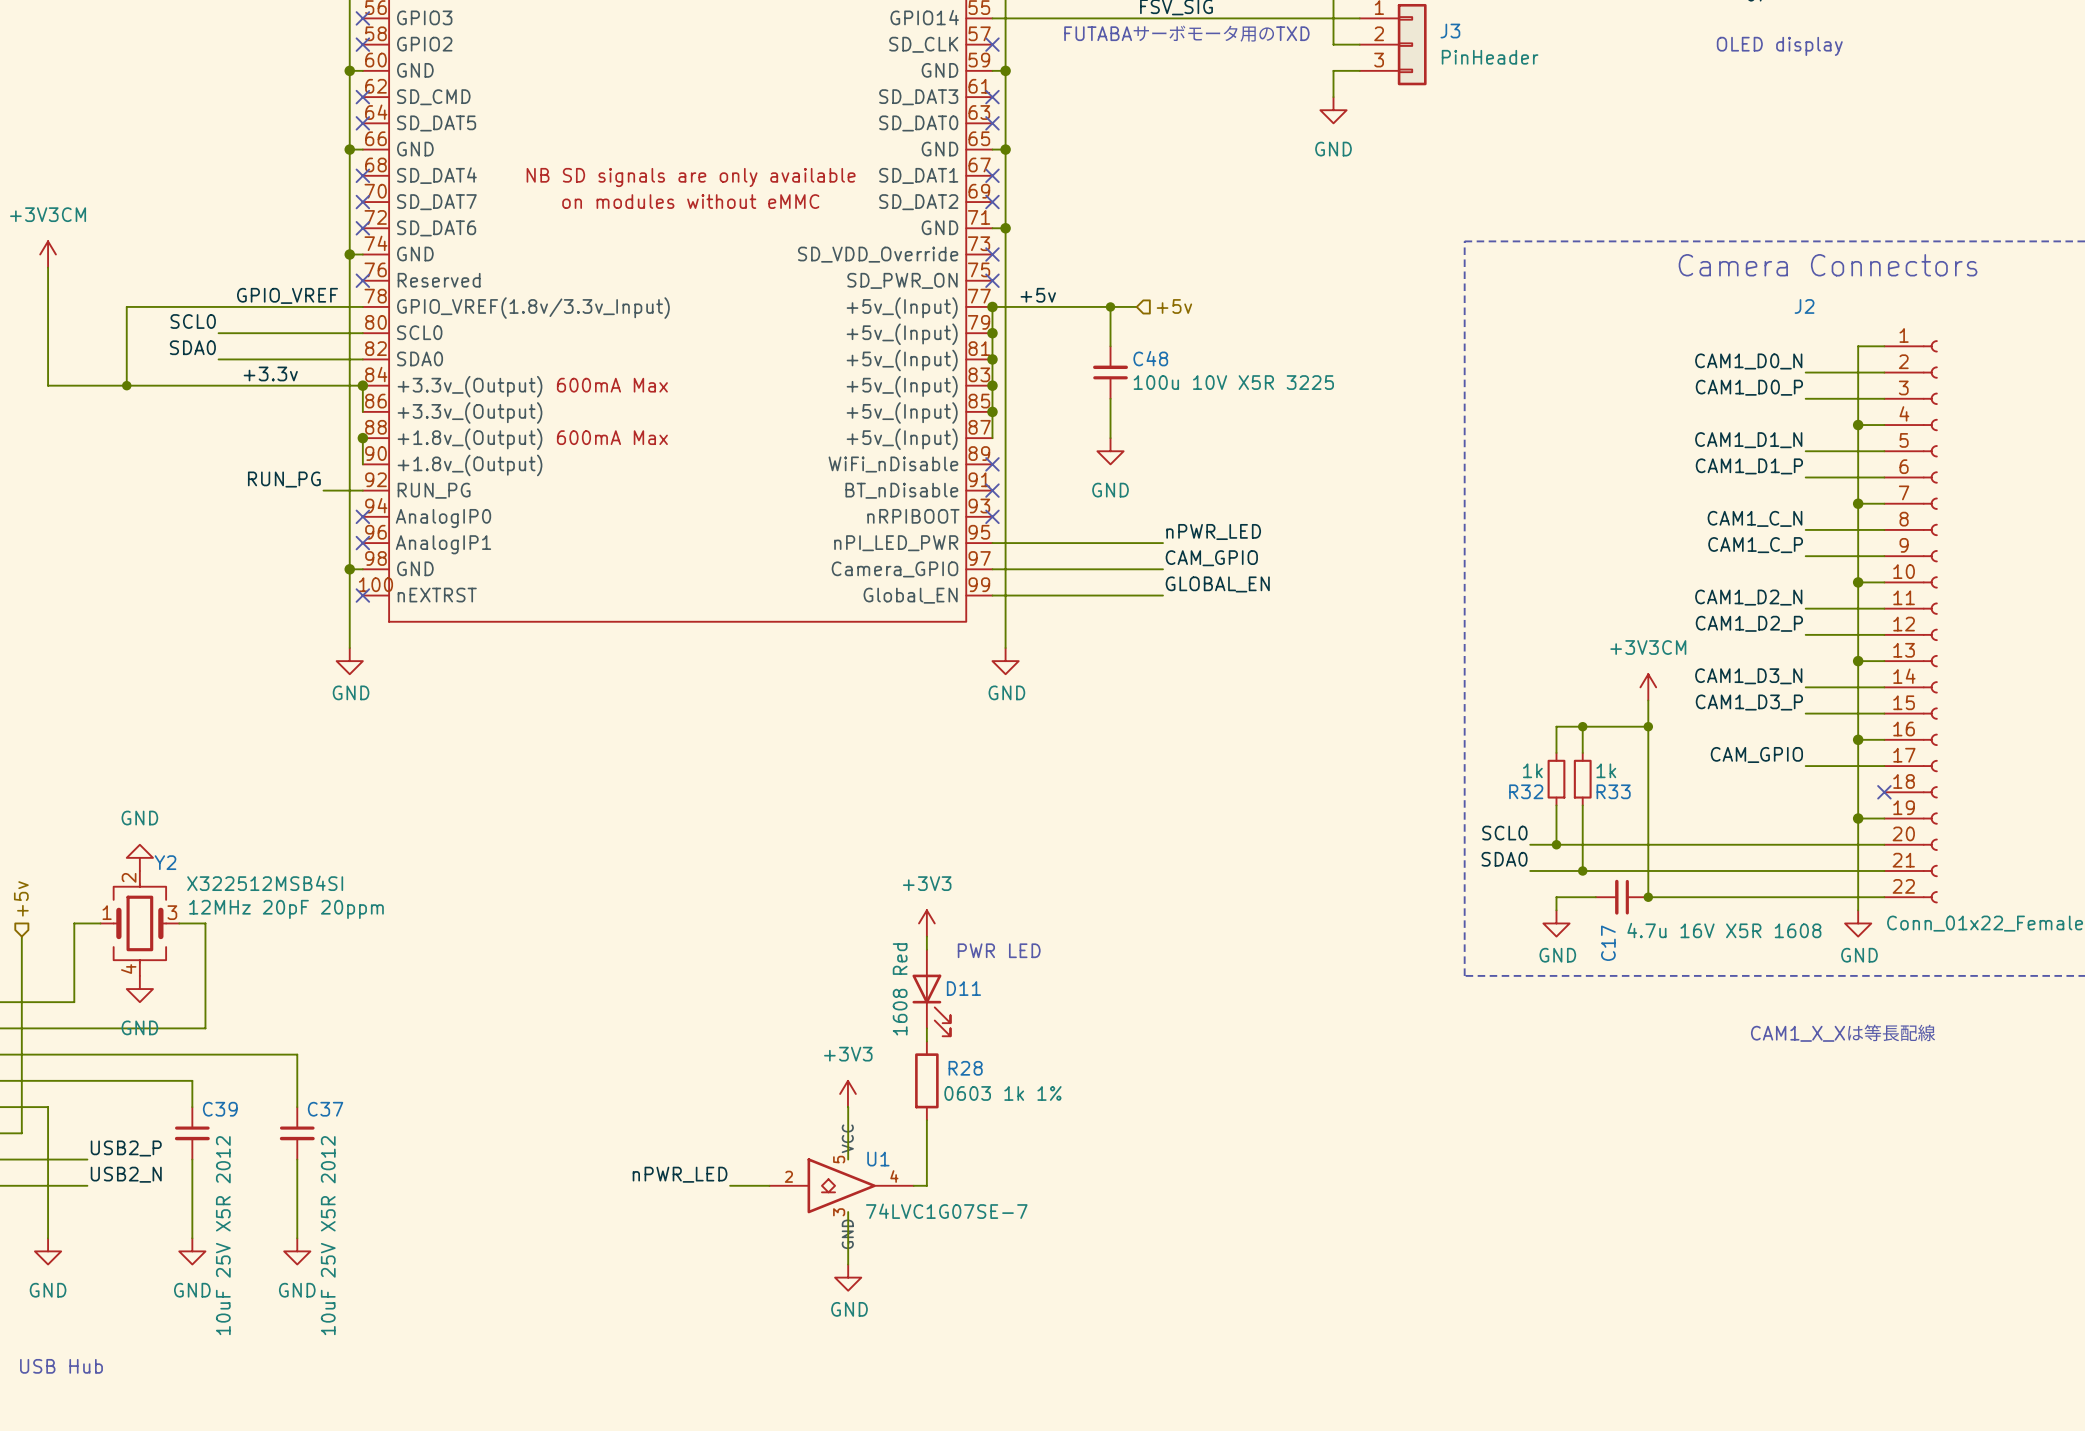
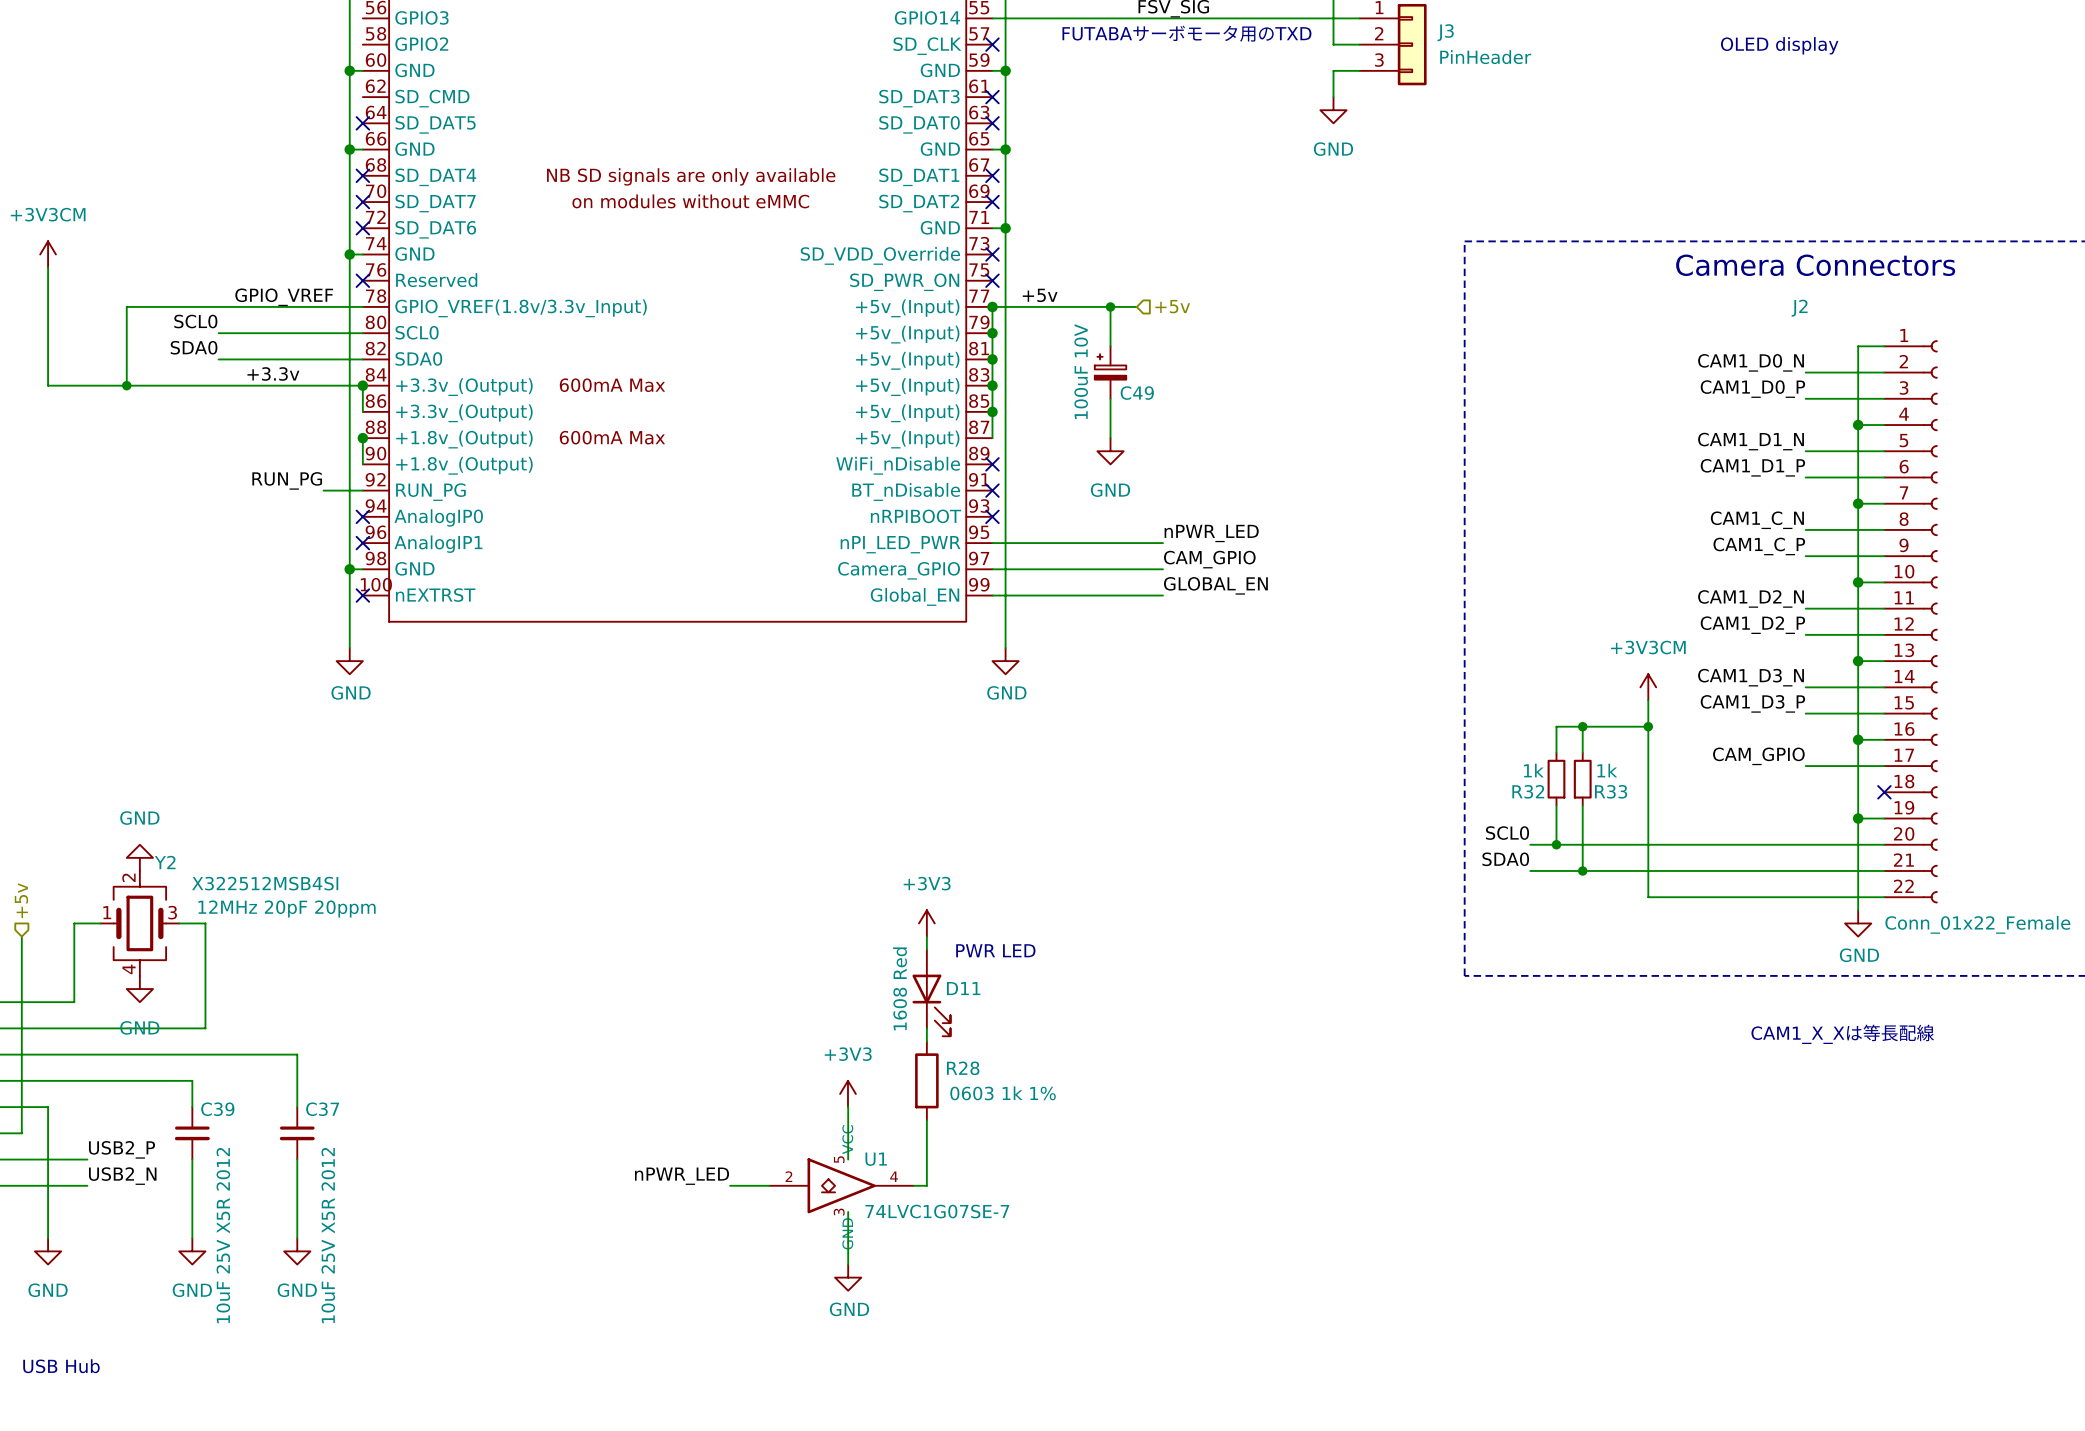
no-connect mark: (362, 18) -> none
no-connect mark: (362, 44) -> none
no-connect mark: (362, 97) -> none
C48: (1110, 372) -> none
C49: none -> (1110, 372)
wire: (1595, 897) (1556, 897) (1556, 910) -> none
C17: (1622, 897) -> none
junction: (1648, 897) -> none
power symbol: GND (1556, 923) -> none

